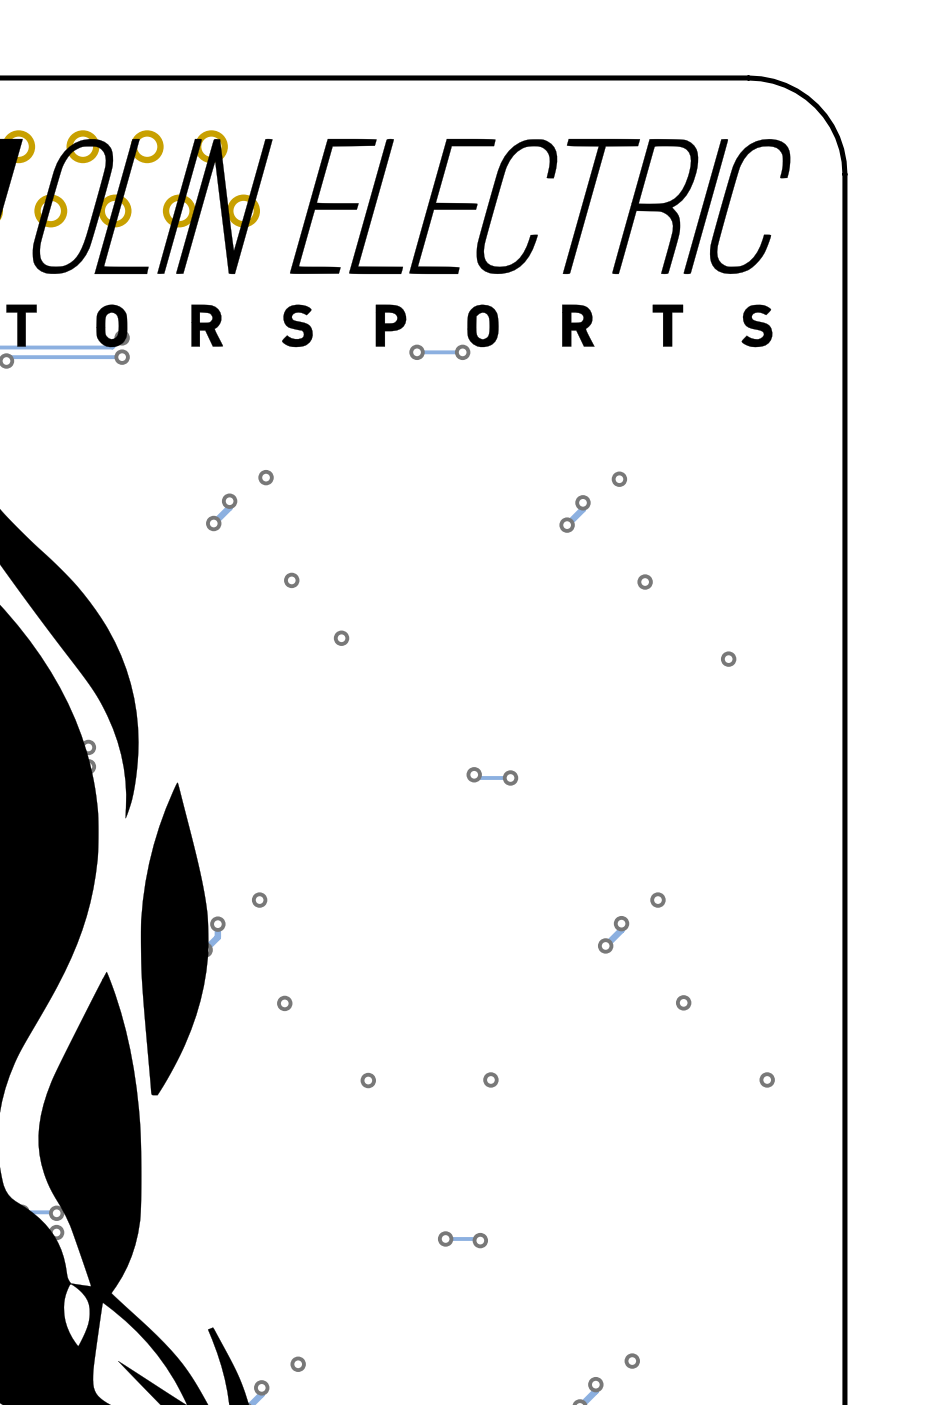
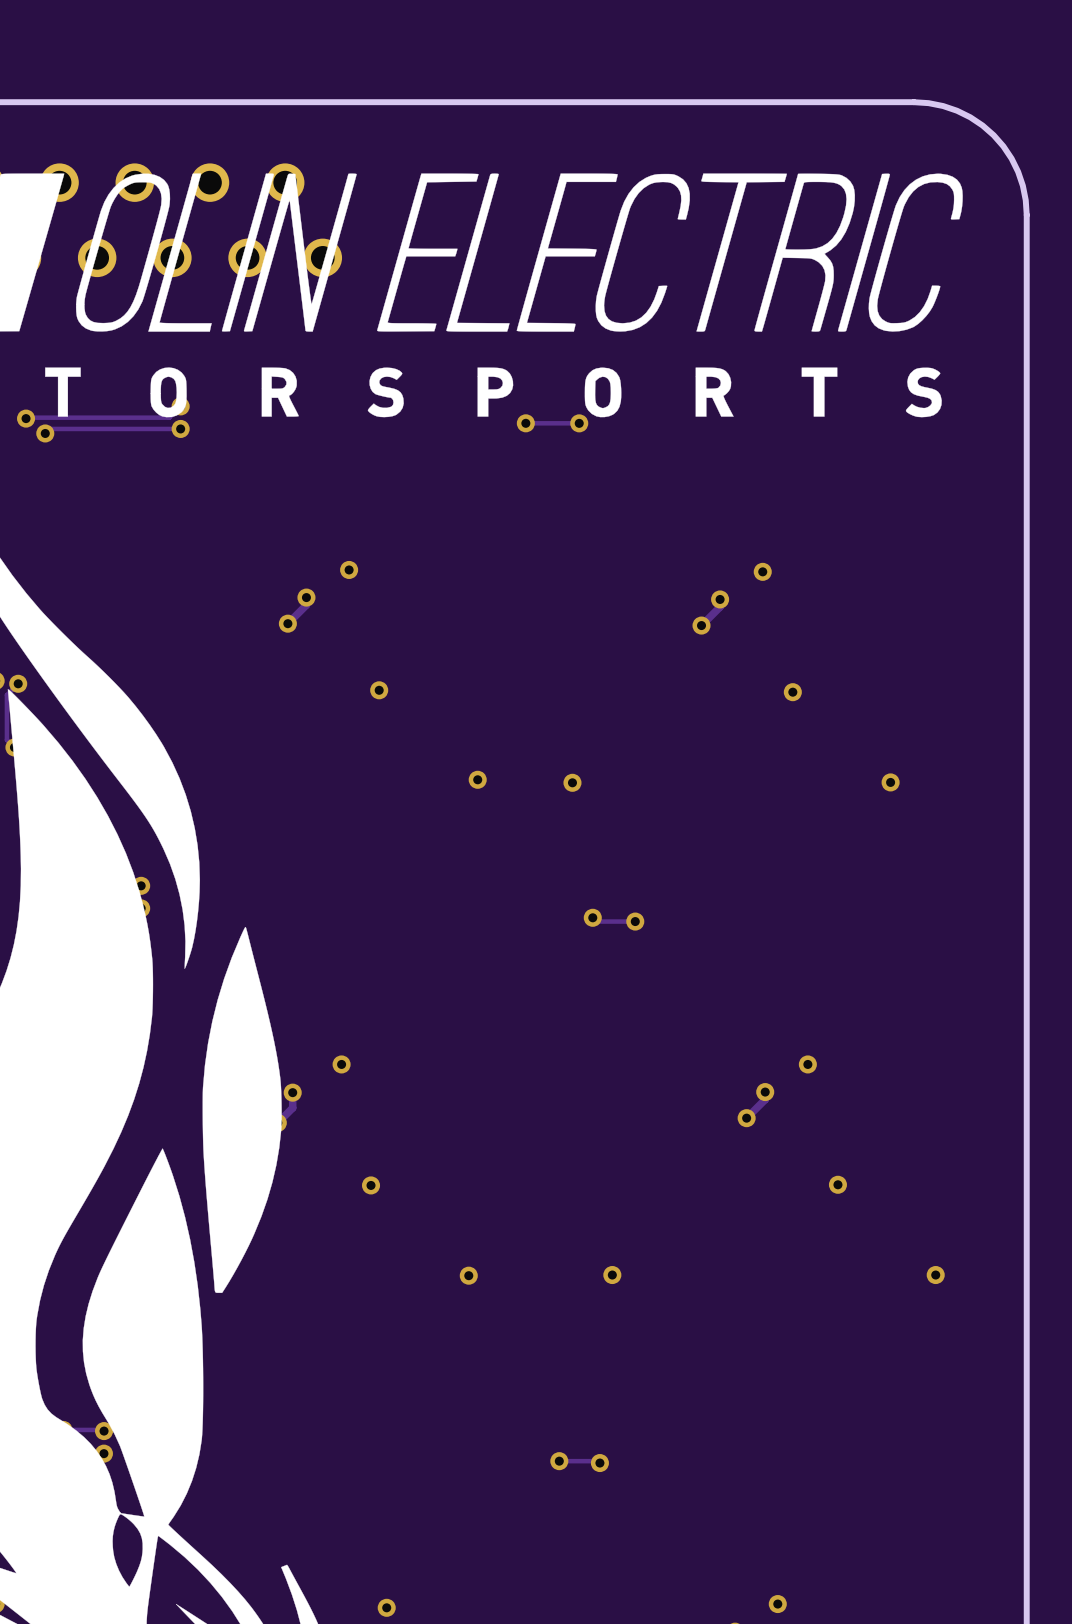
via position: (341, 638) -> (477, 779)
via: none -> (572, 782)

